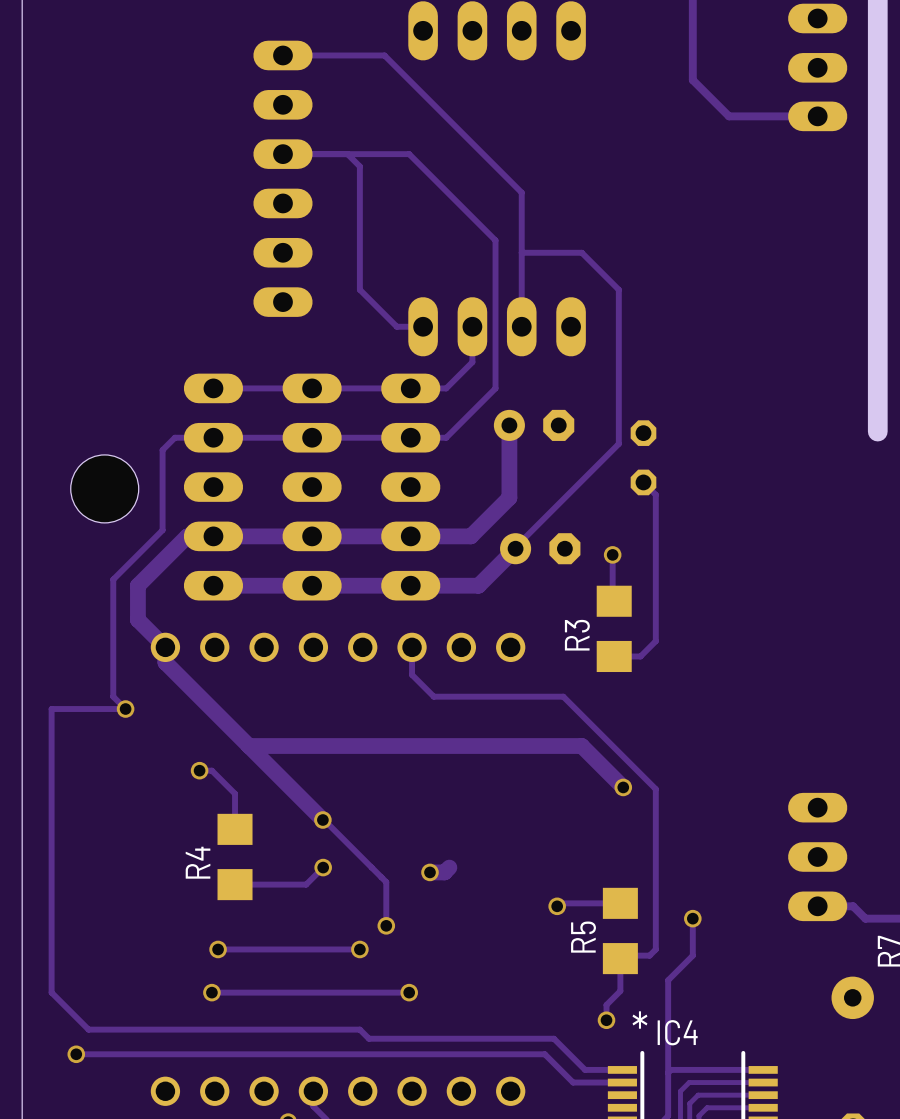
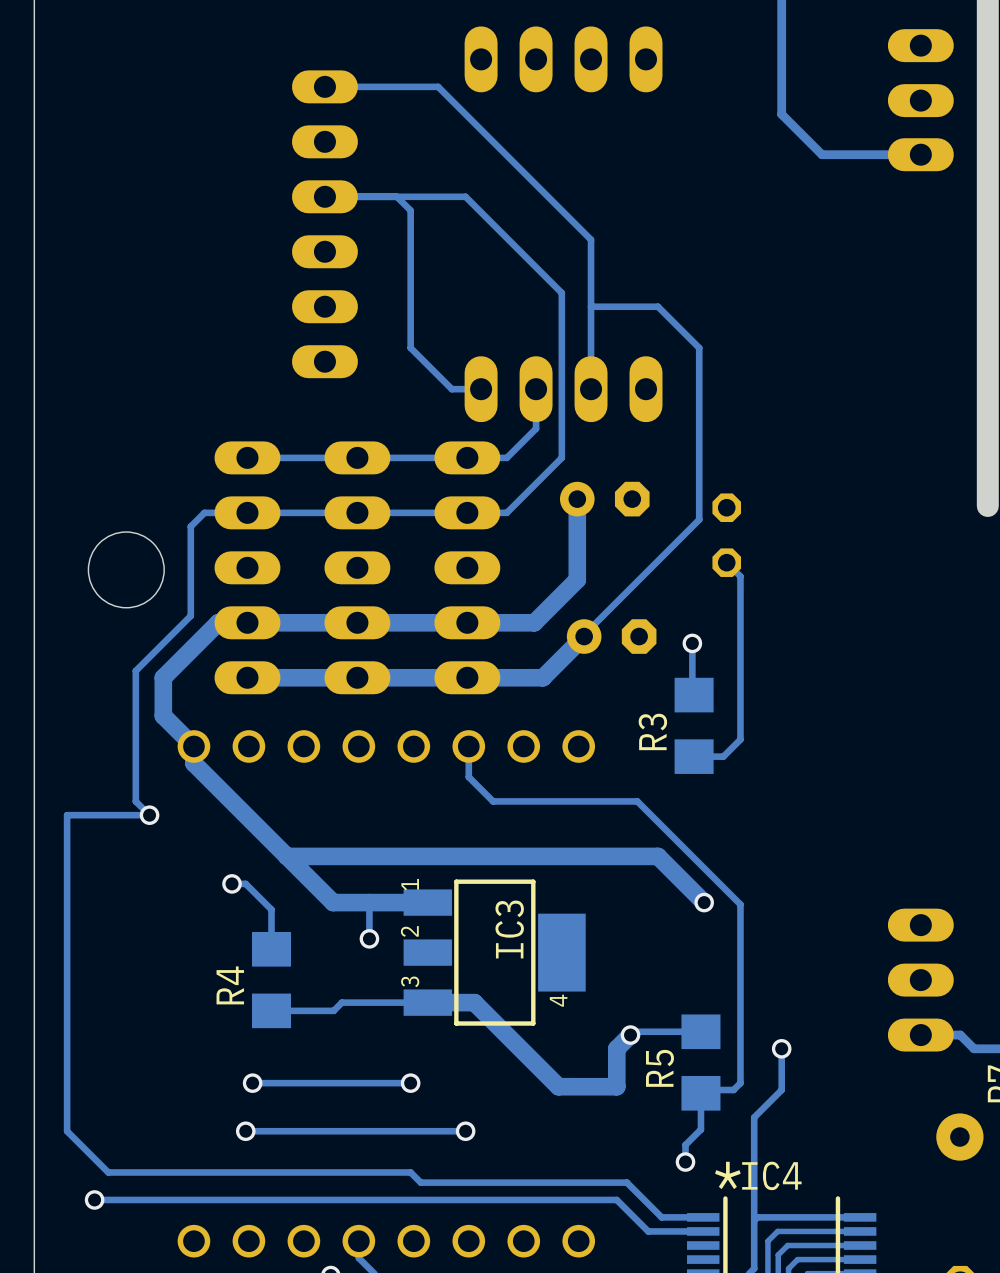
track: (290, 787) (386, 882) (386, 925) -> (333, 902) (427, 902)
track: none -> (369, 902) (369, 938)
IC3: none -> (494, 952)
track: (323, 867) (306, 884) (290, 884) -> (630, 1035) (616, 1048) (616, 1086) (558, 1086) (474, 1002) (341, 1002) (333, 1010)
via: (323, 867) -> none
track: (449, 867) (444, 872) (429, 872) -> none
via: (429, 872) -> none
via: (386, 925) -> none

